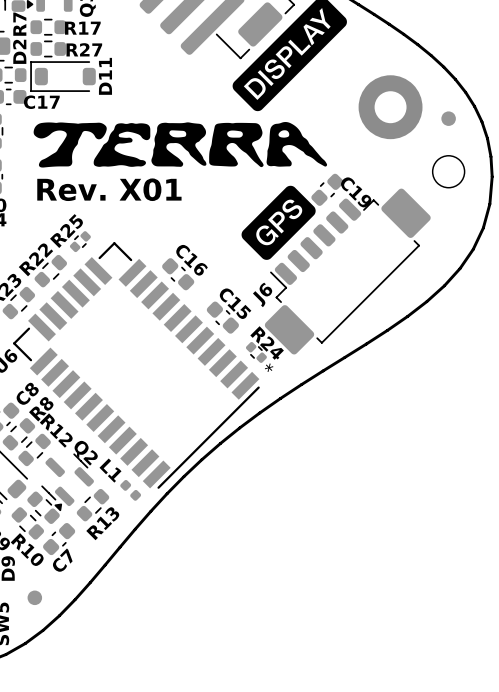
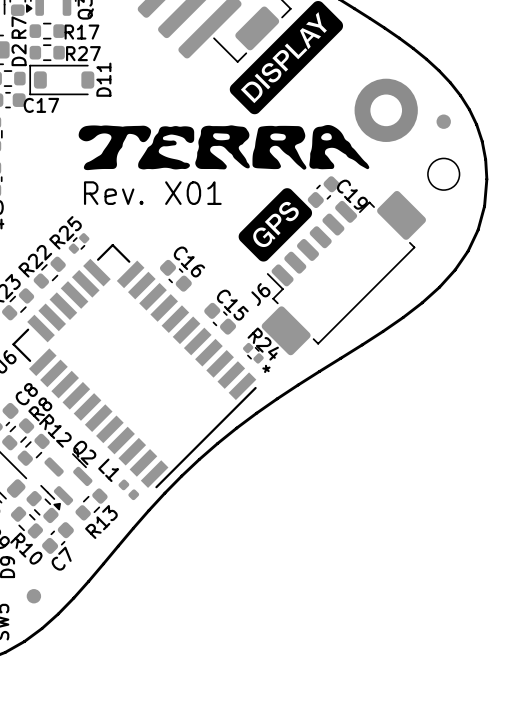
drawing position: (70, 144) -> (114, 147)
drawing position: (122, 144) -> (166, 147)
drawing position: (178, 144) -> (222, 147)
drawing position: (236, 144) -> (279, 147)
drawing position: (296, 144) -> (339, 147)
text position: Rev. X01 (109, 189) -> Rev. X01 (152, 193)

